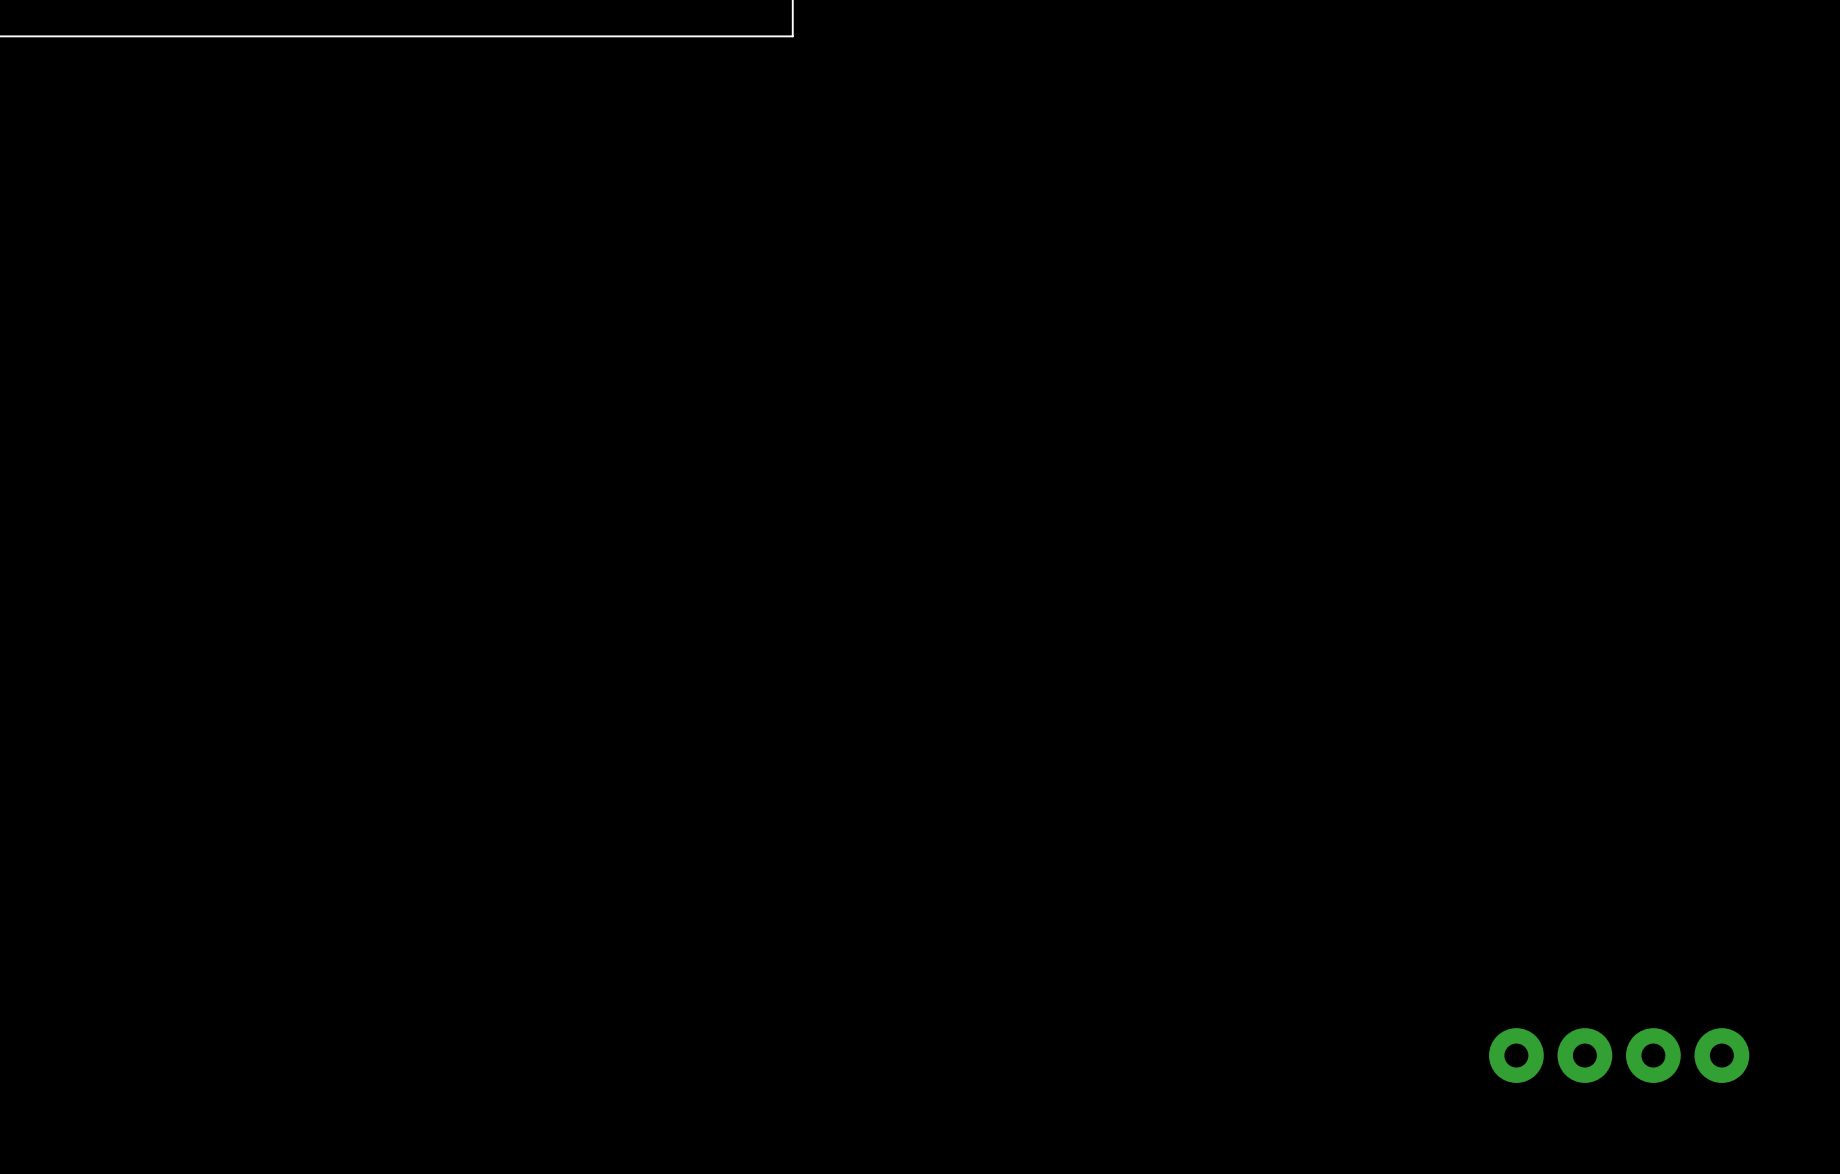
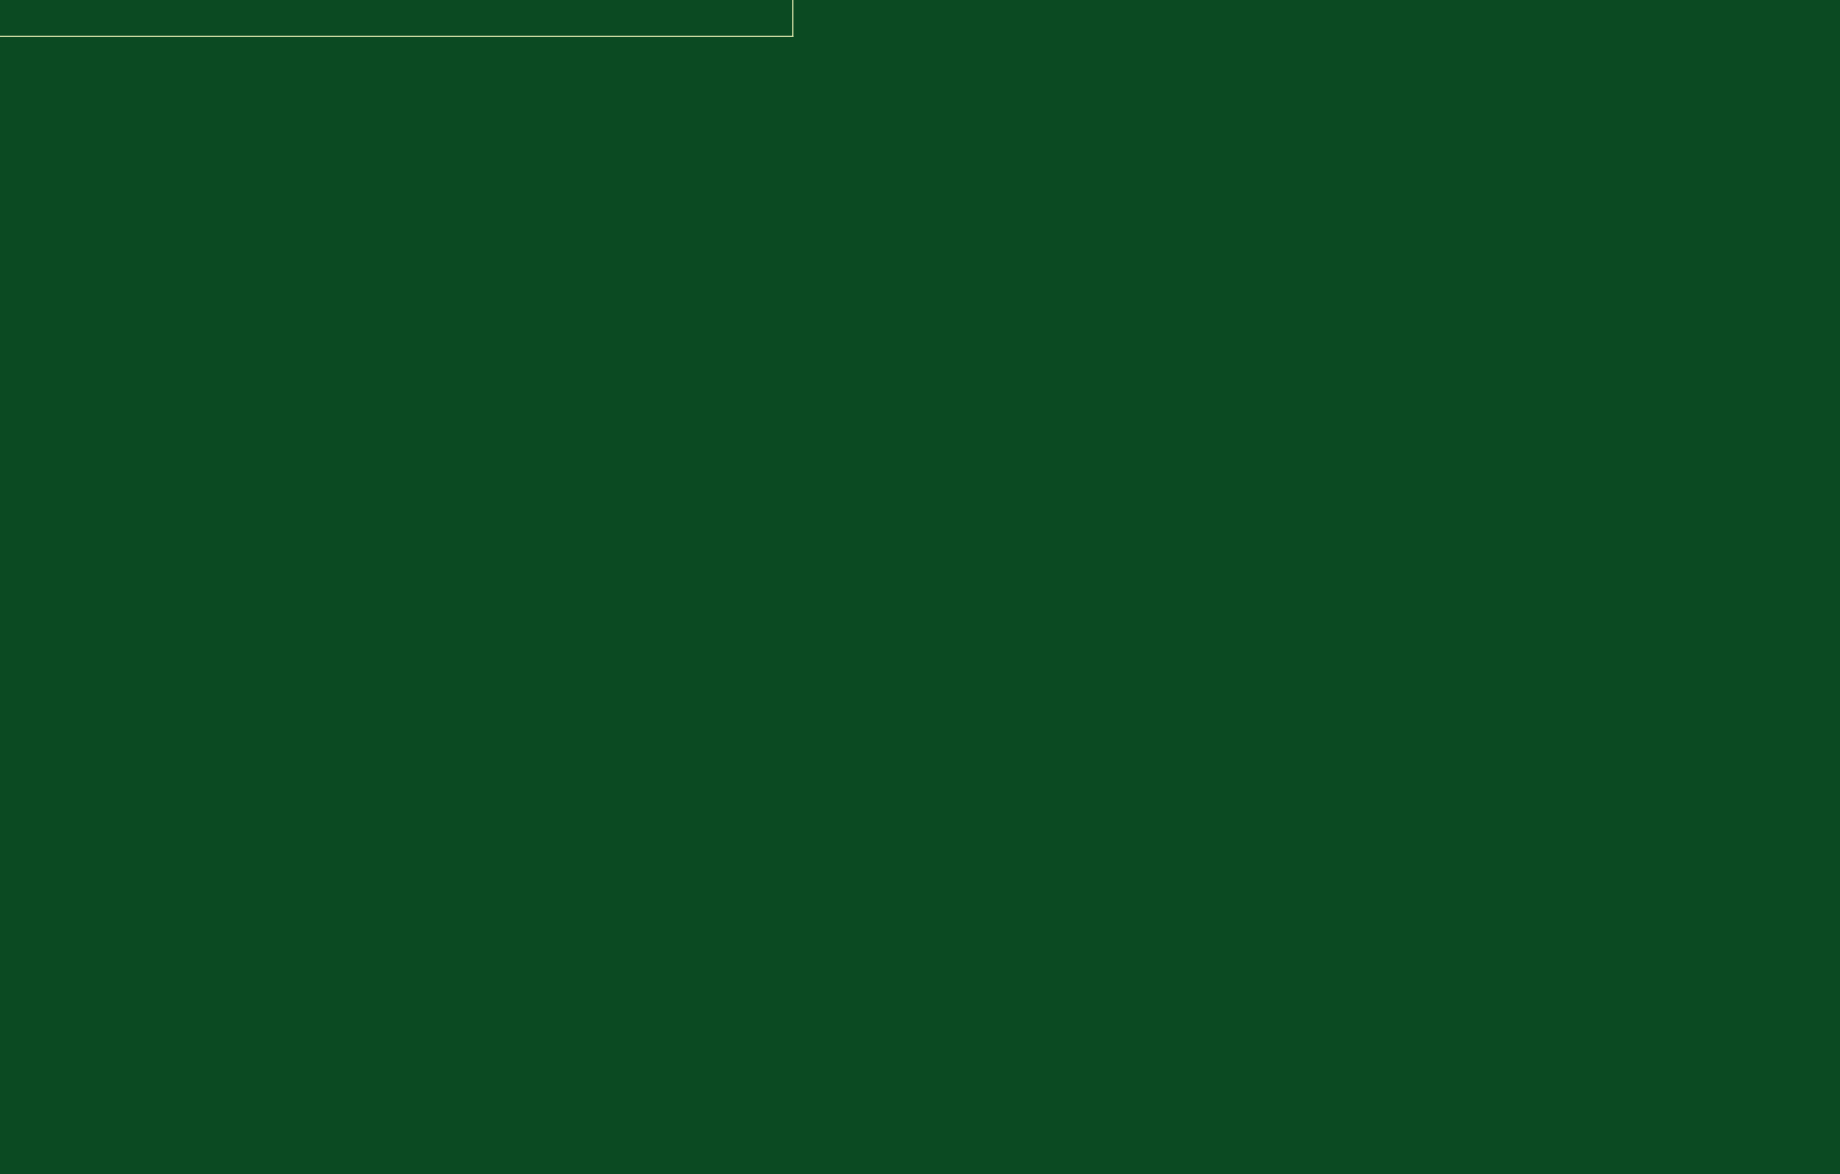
part: (1619, 1055) -> none

